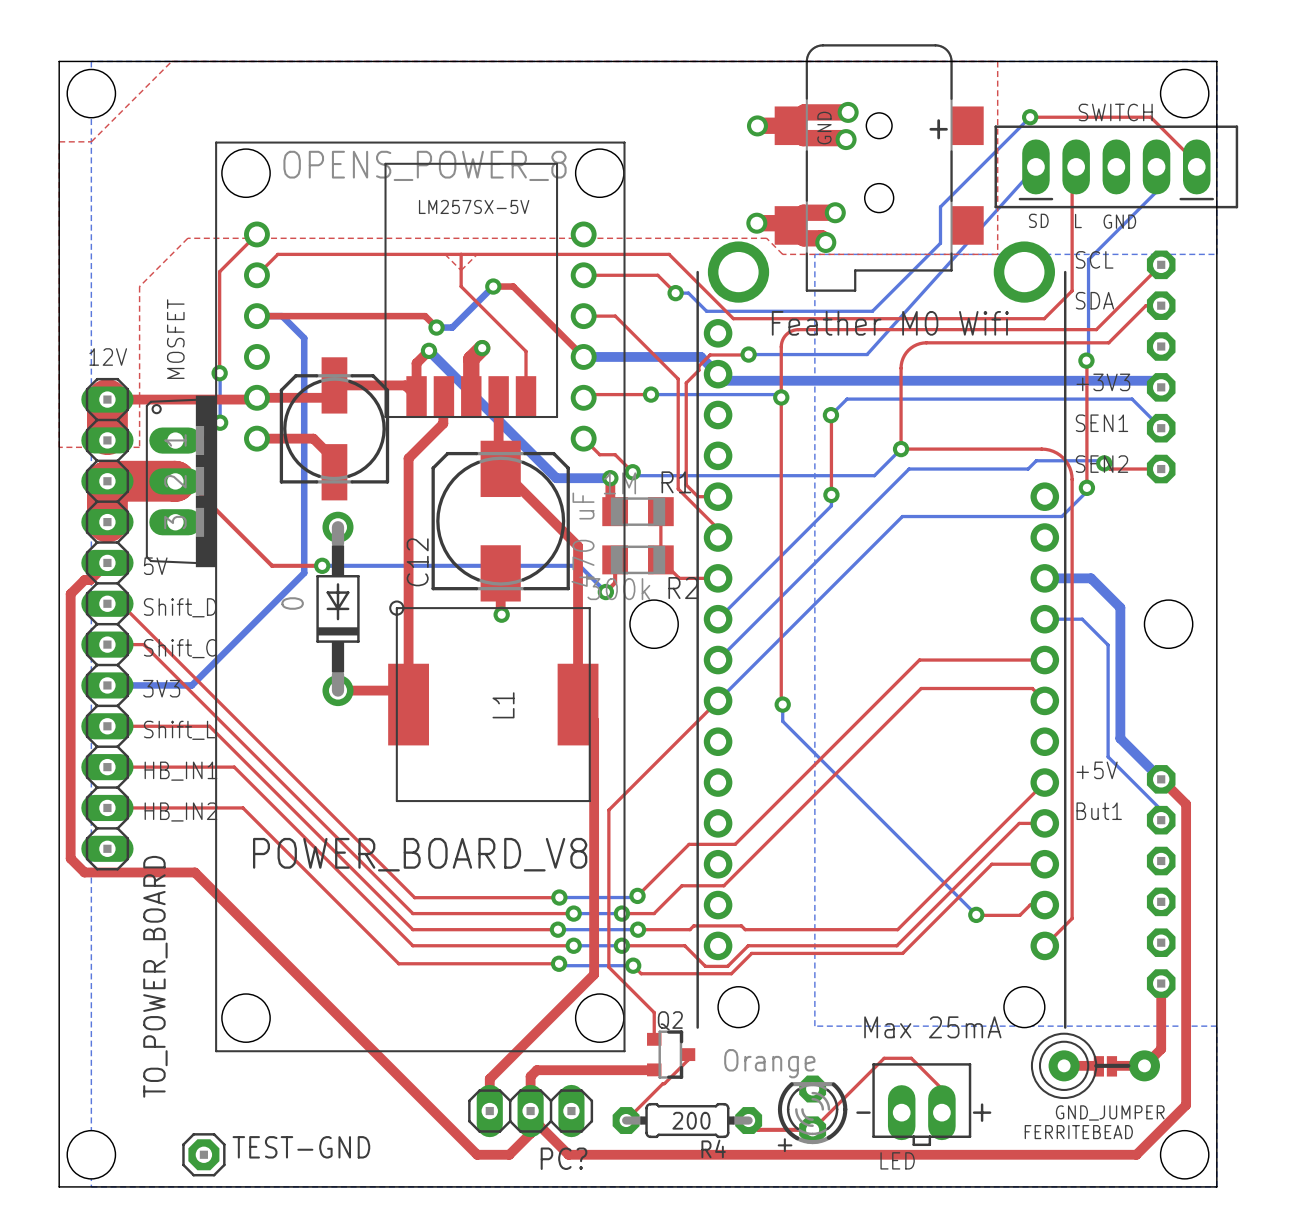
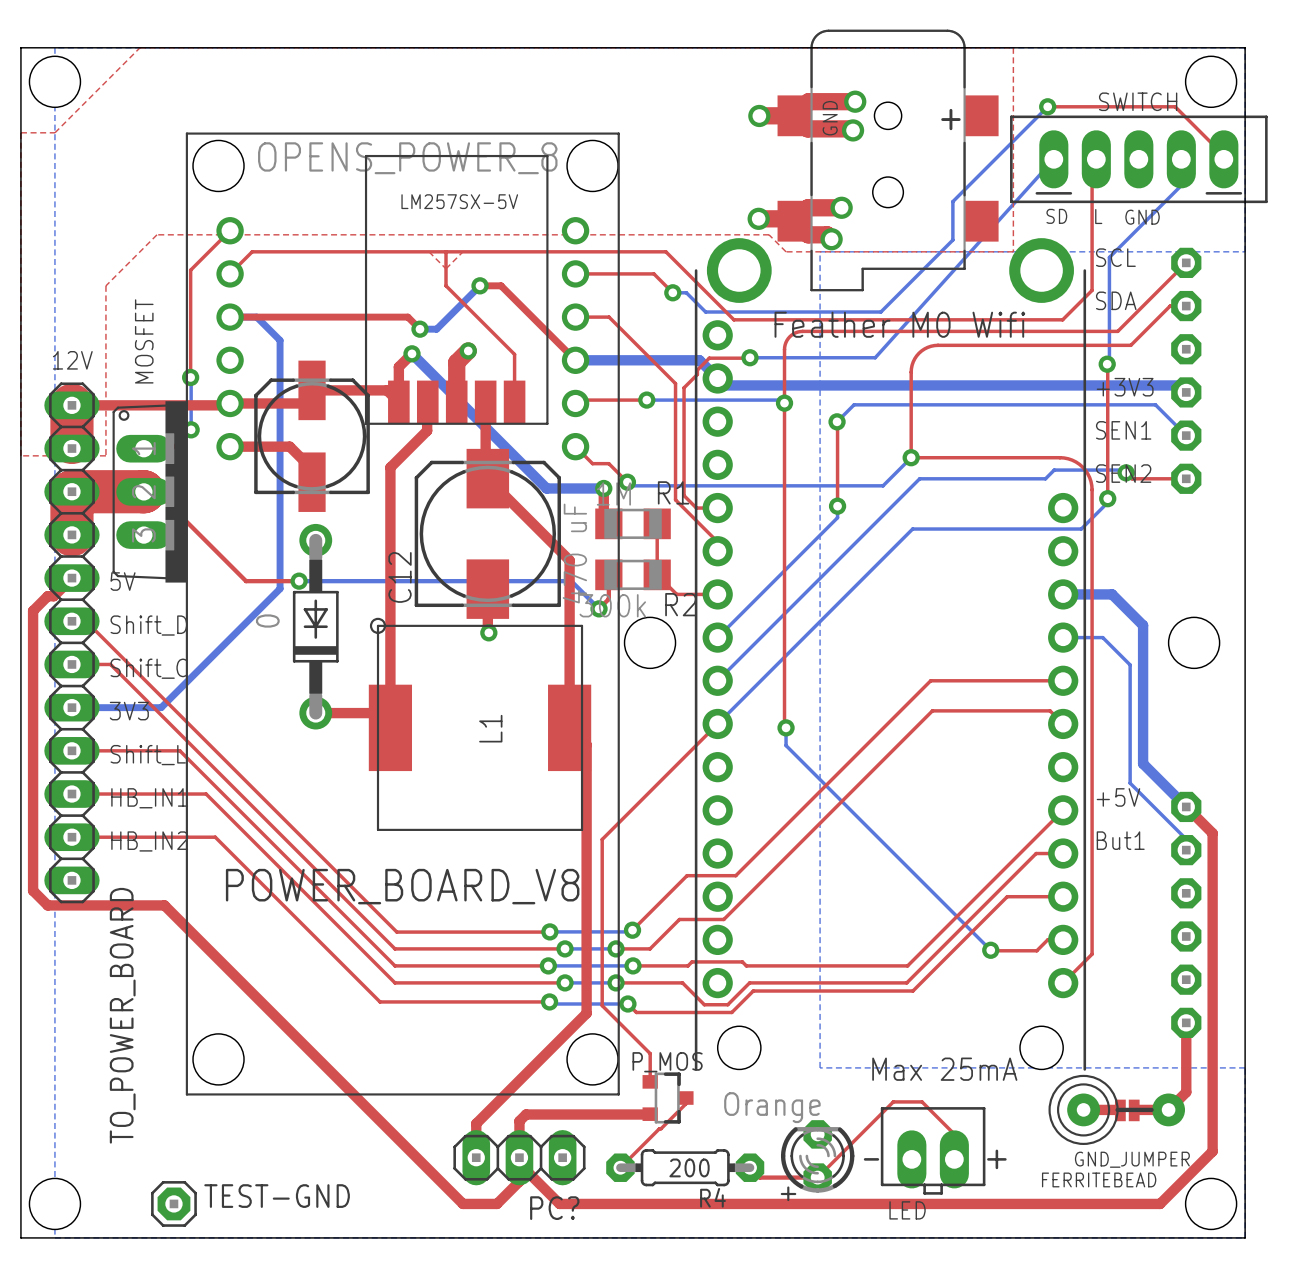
Q2 name: Q2 (670, 1020) -> P_MOS (667, 1062)

